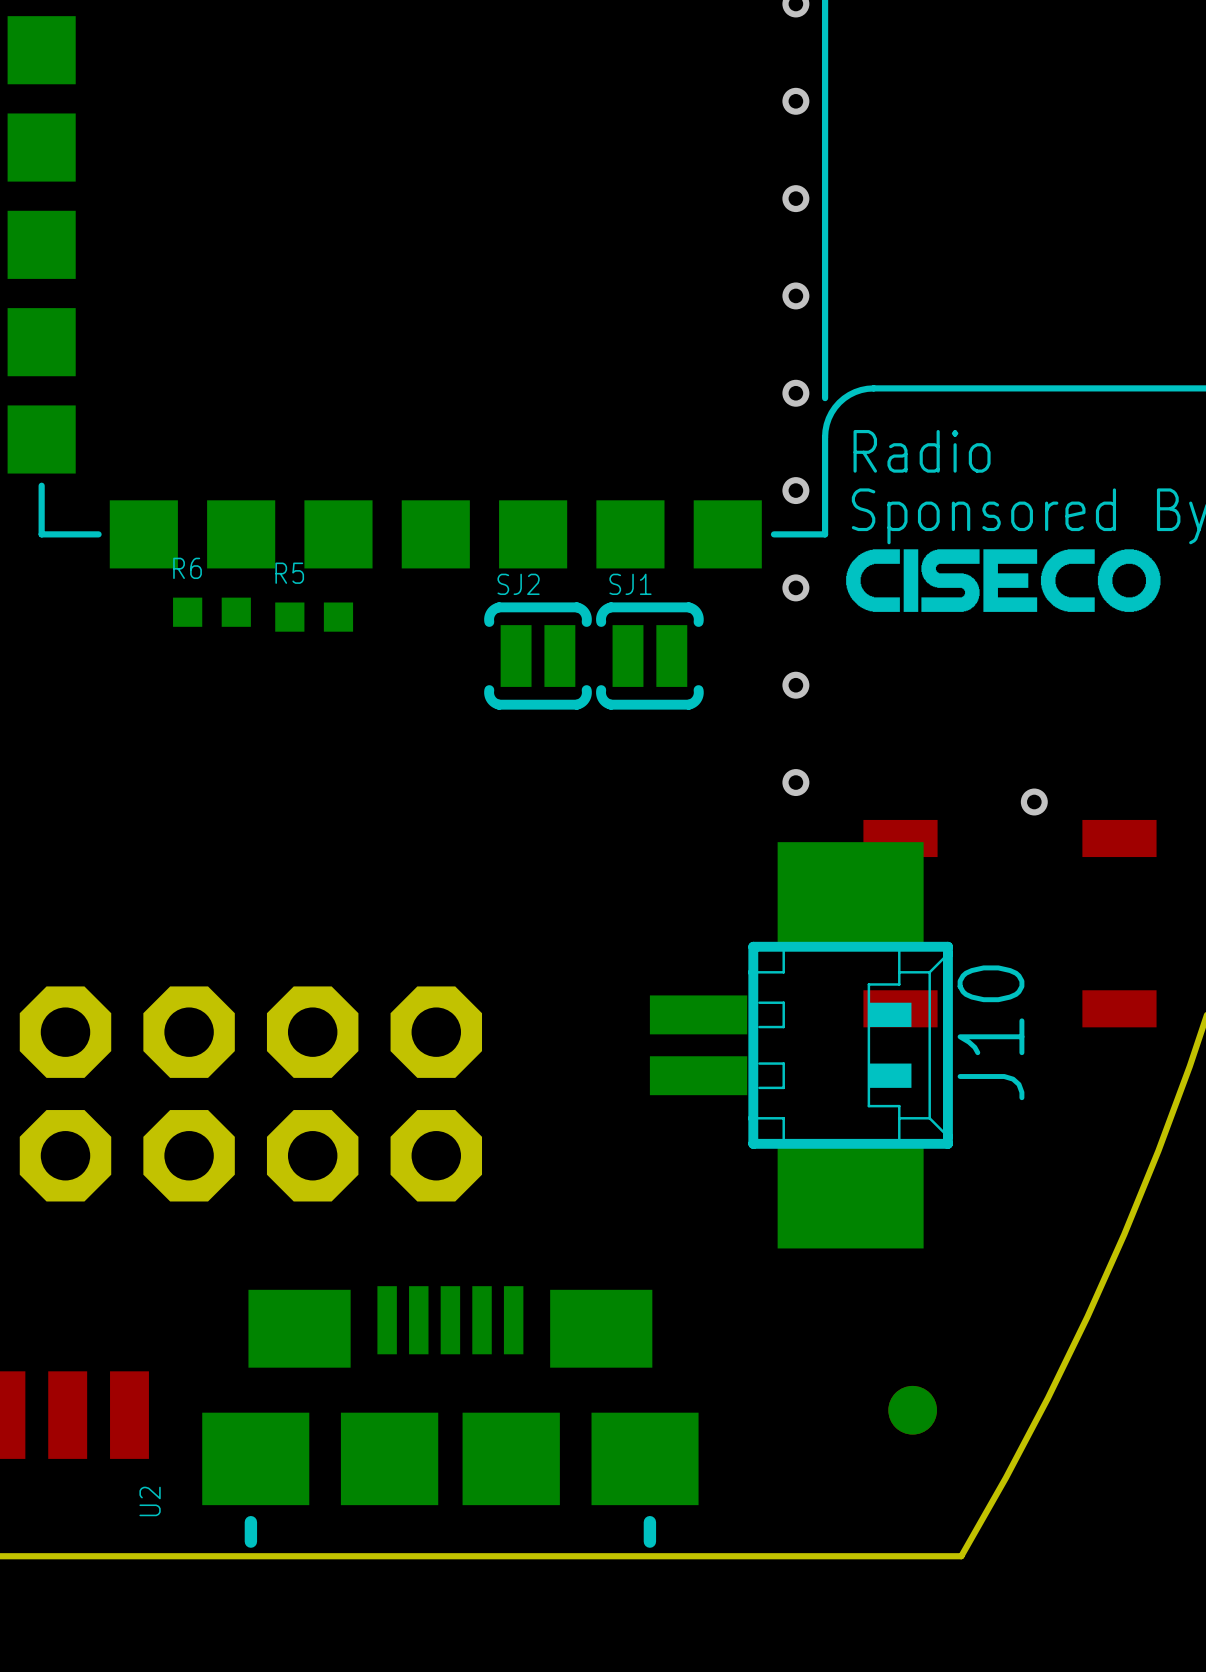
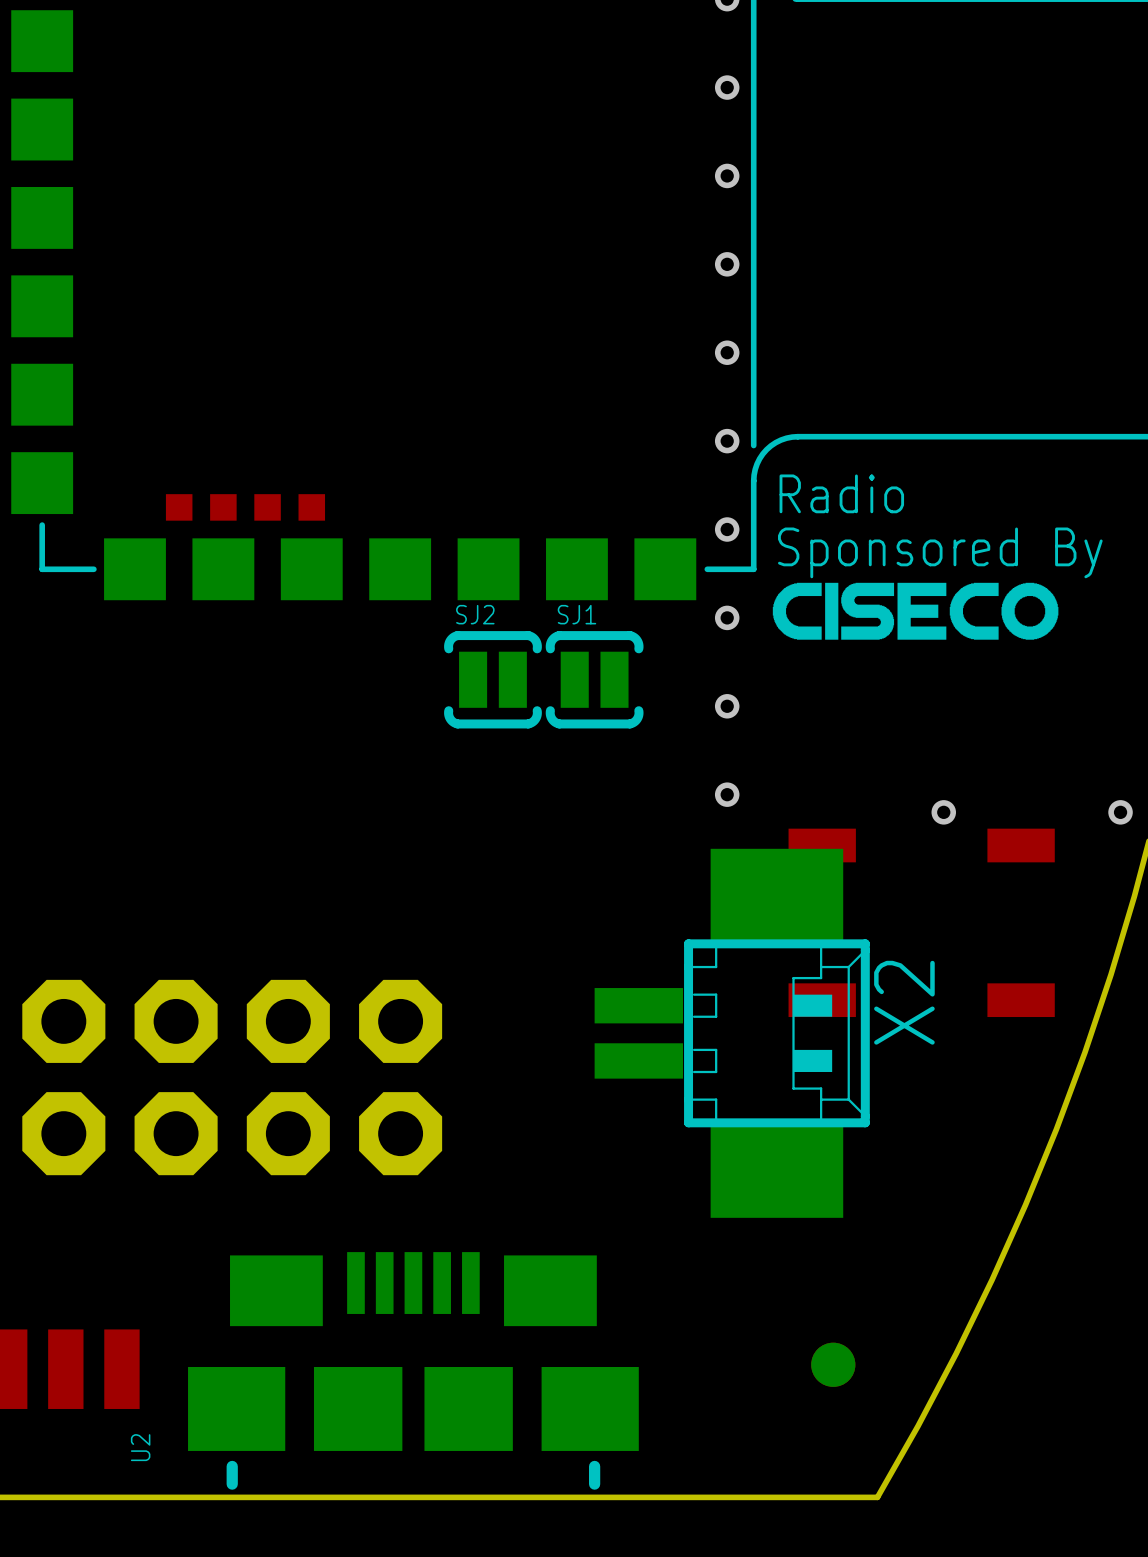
R6 side: bottom (211, 612) -> top (201, 507)
R5 side: bottom (314, 617) -> top (289, 507)
J10 name: J10 (991, 1032) -> X2 (904, 1002)

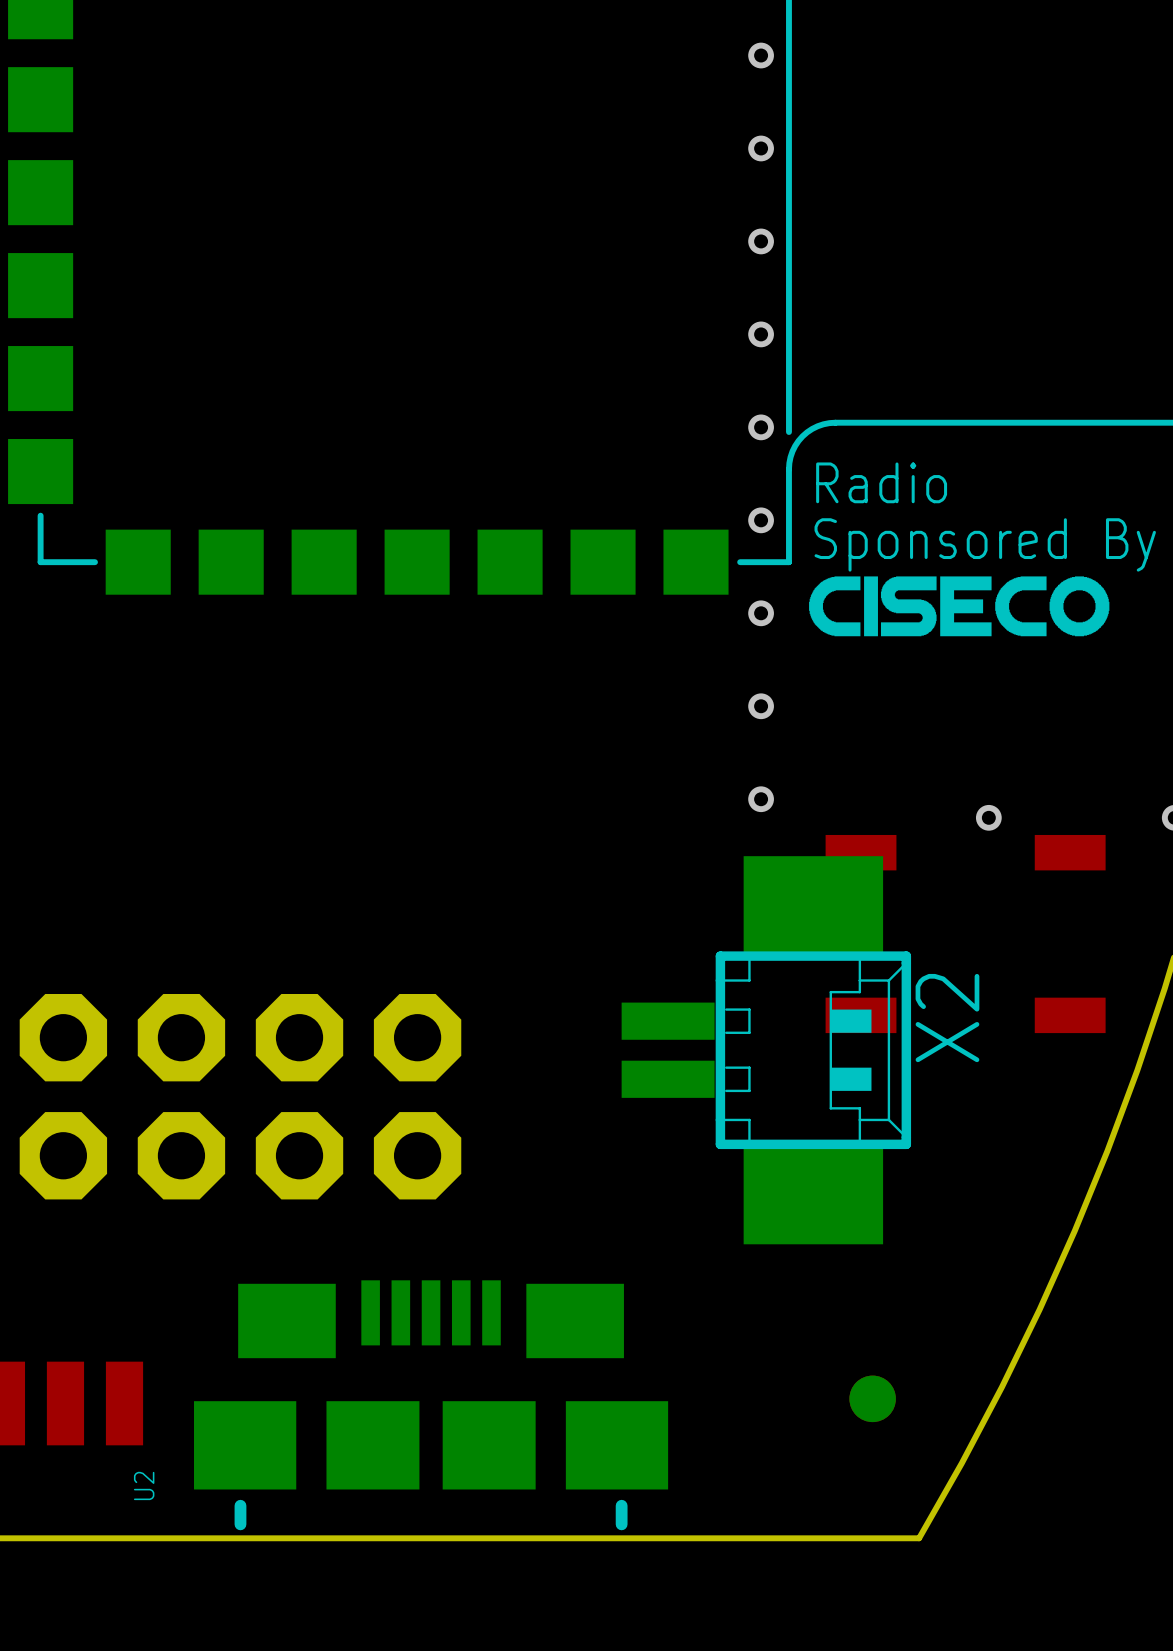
part: (201, 507) -> none
part: (289, 507) -> none
SJ2: (492, 679) -> none
SJ1: (594, 679) -> none

